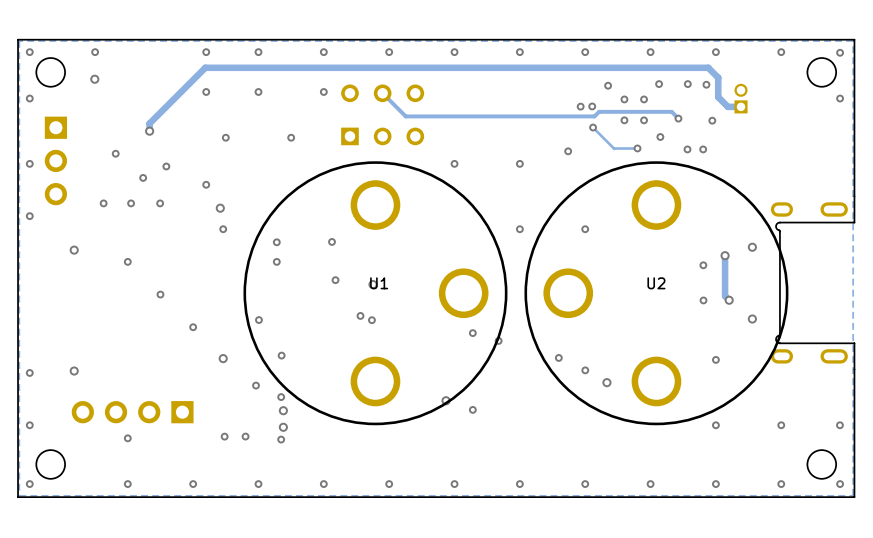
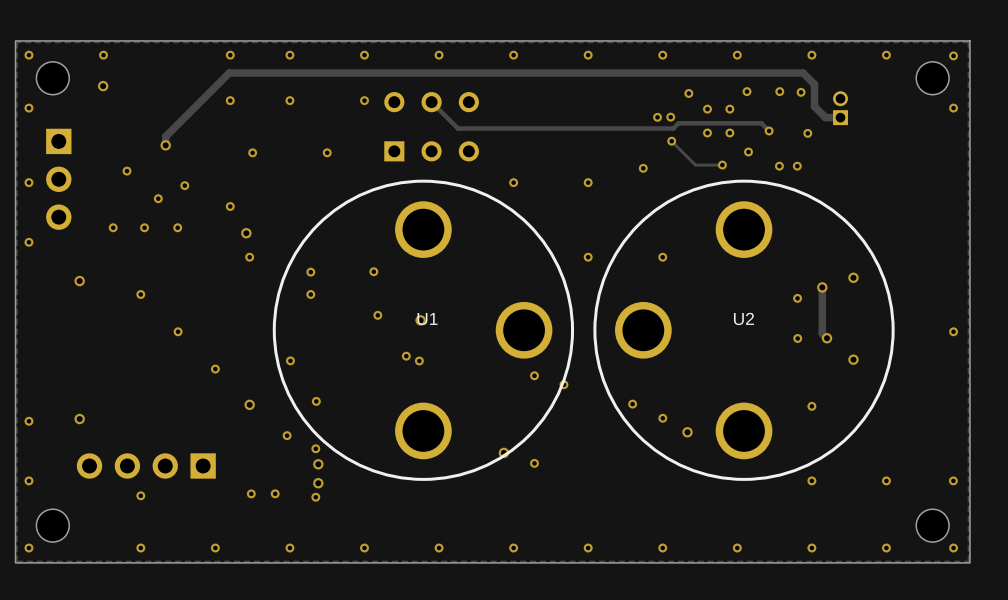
part footprint: [17, 39, 855, 498] -> [15, 40, 971, 564]
part: (812, 282) -> none
via: none -> (953, 331)

